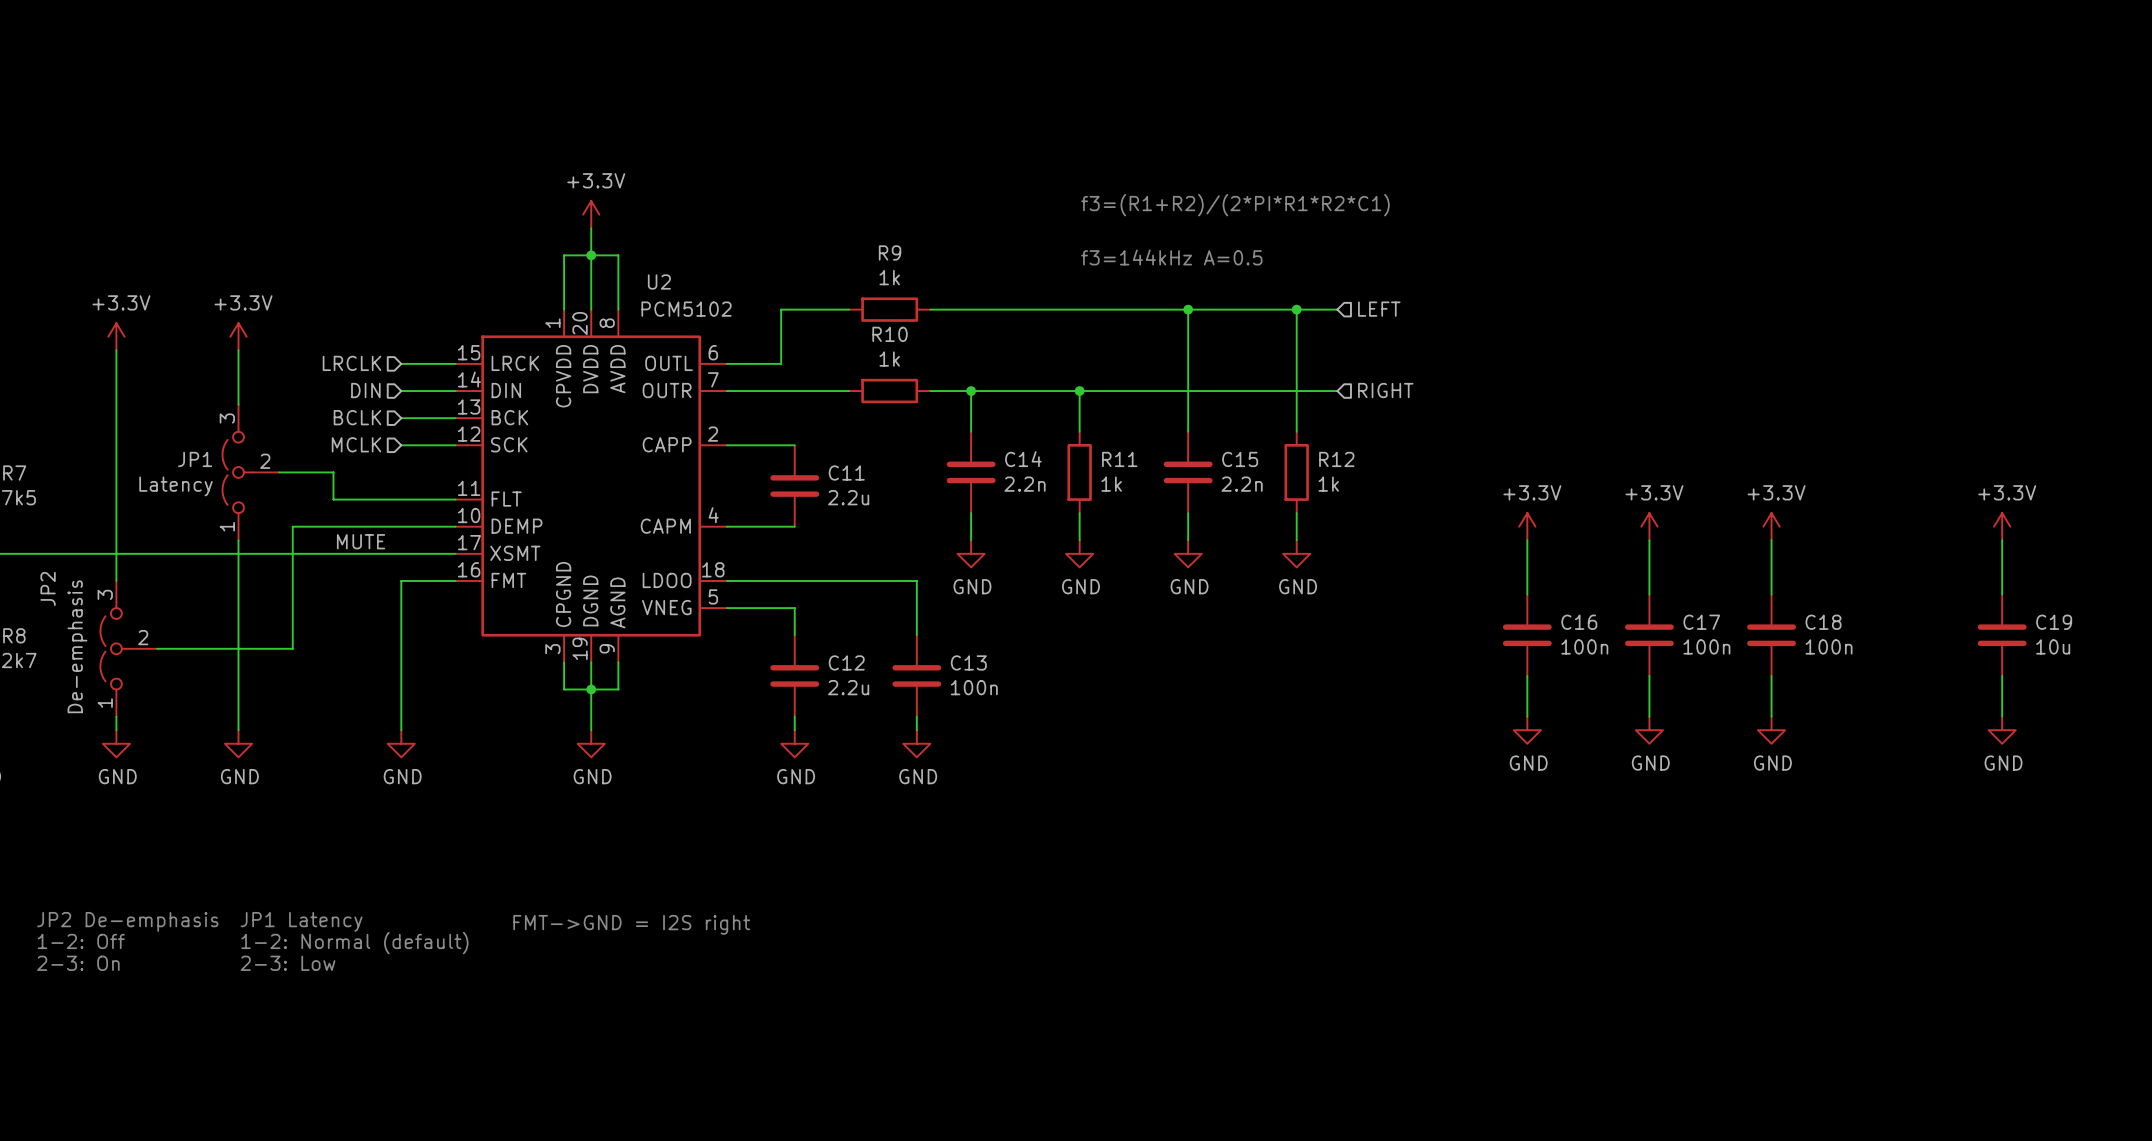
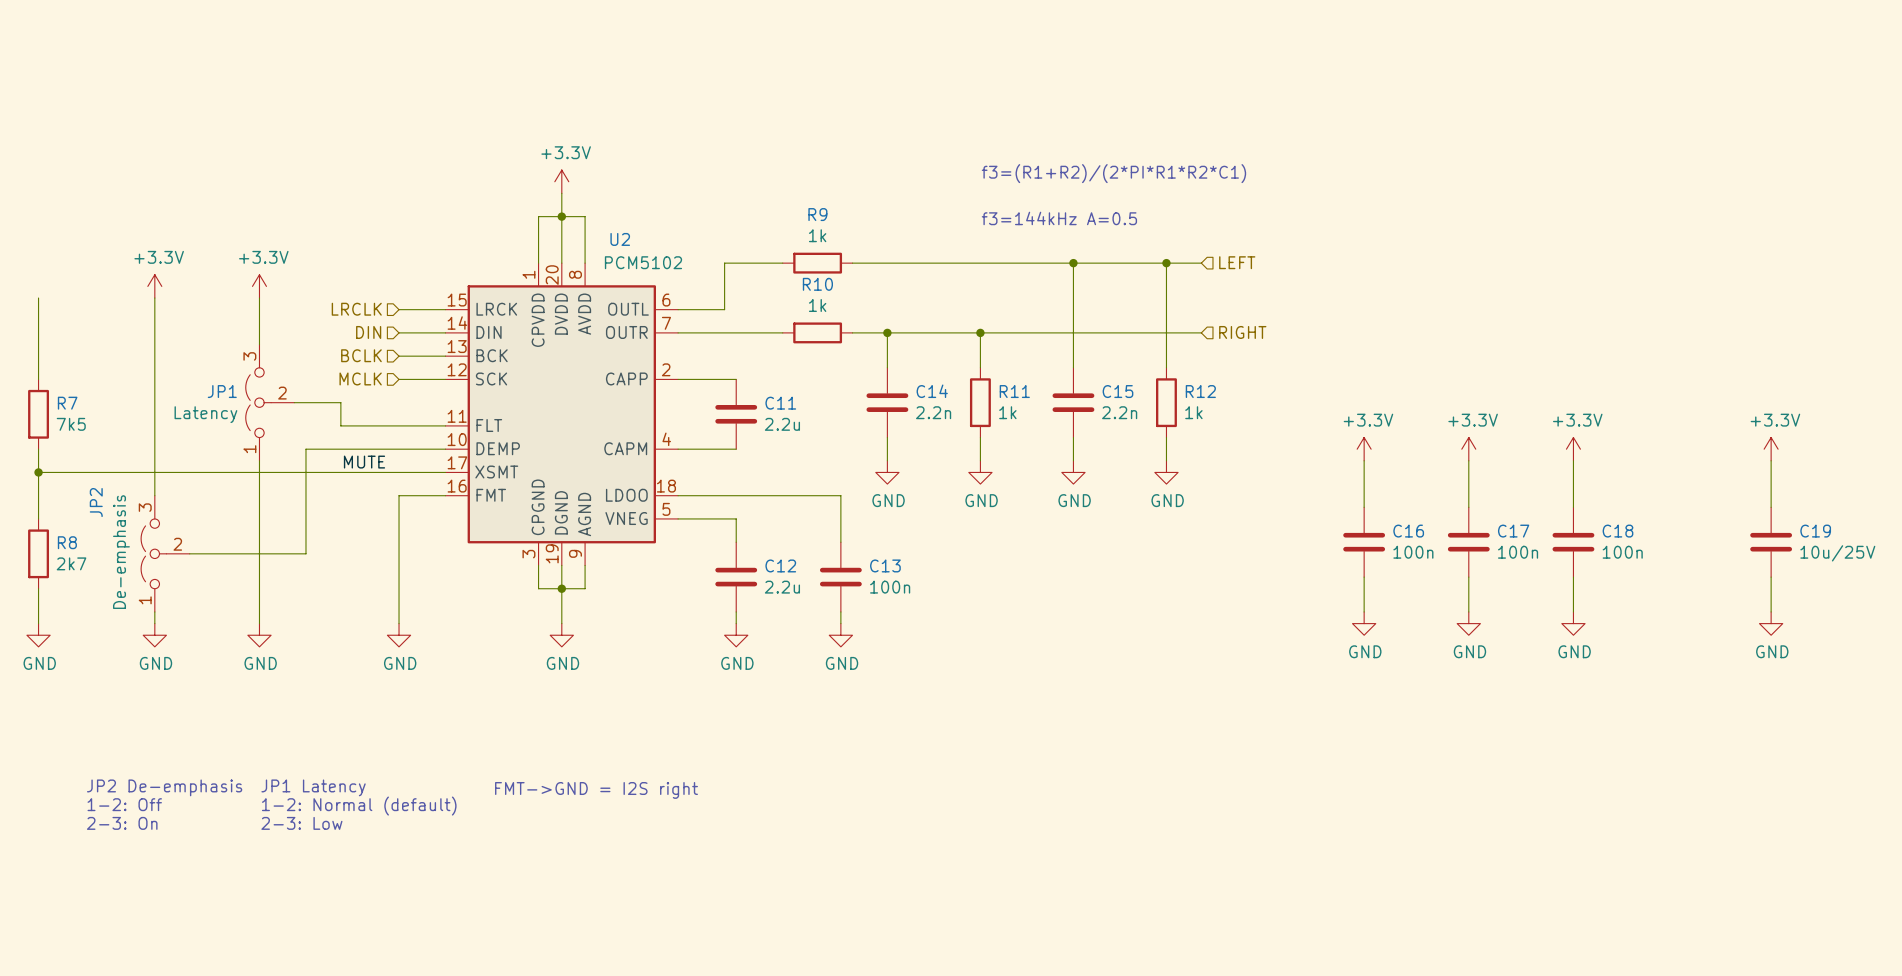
C19 value: 10u (2053, 646) -> 10u/25V (1837, 553)

